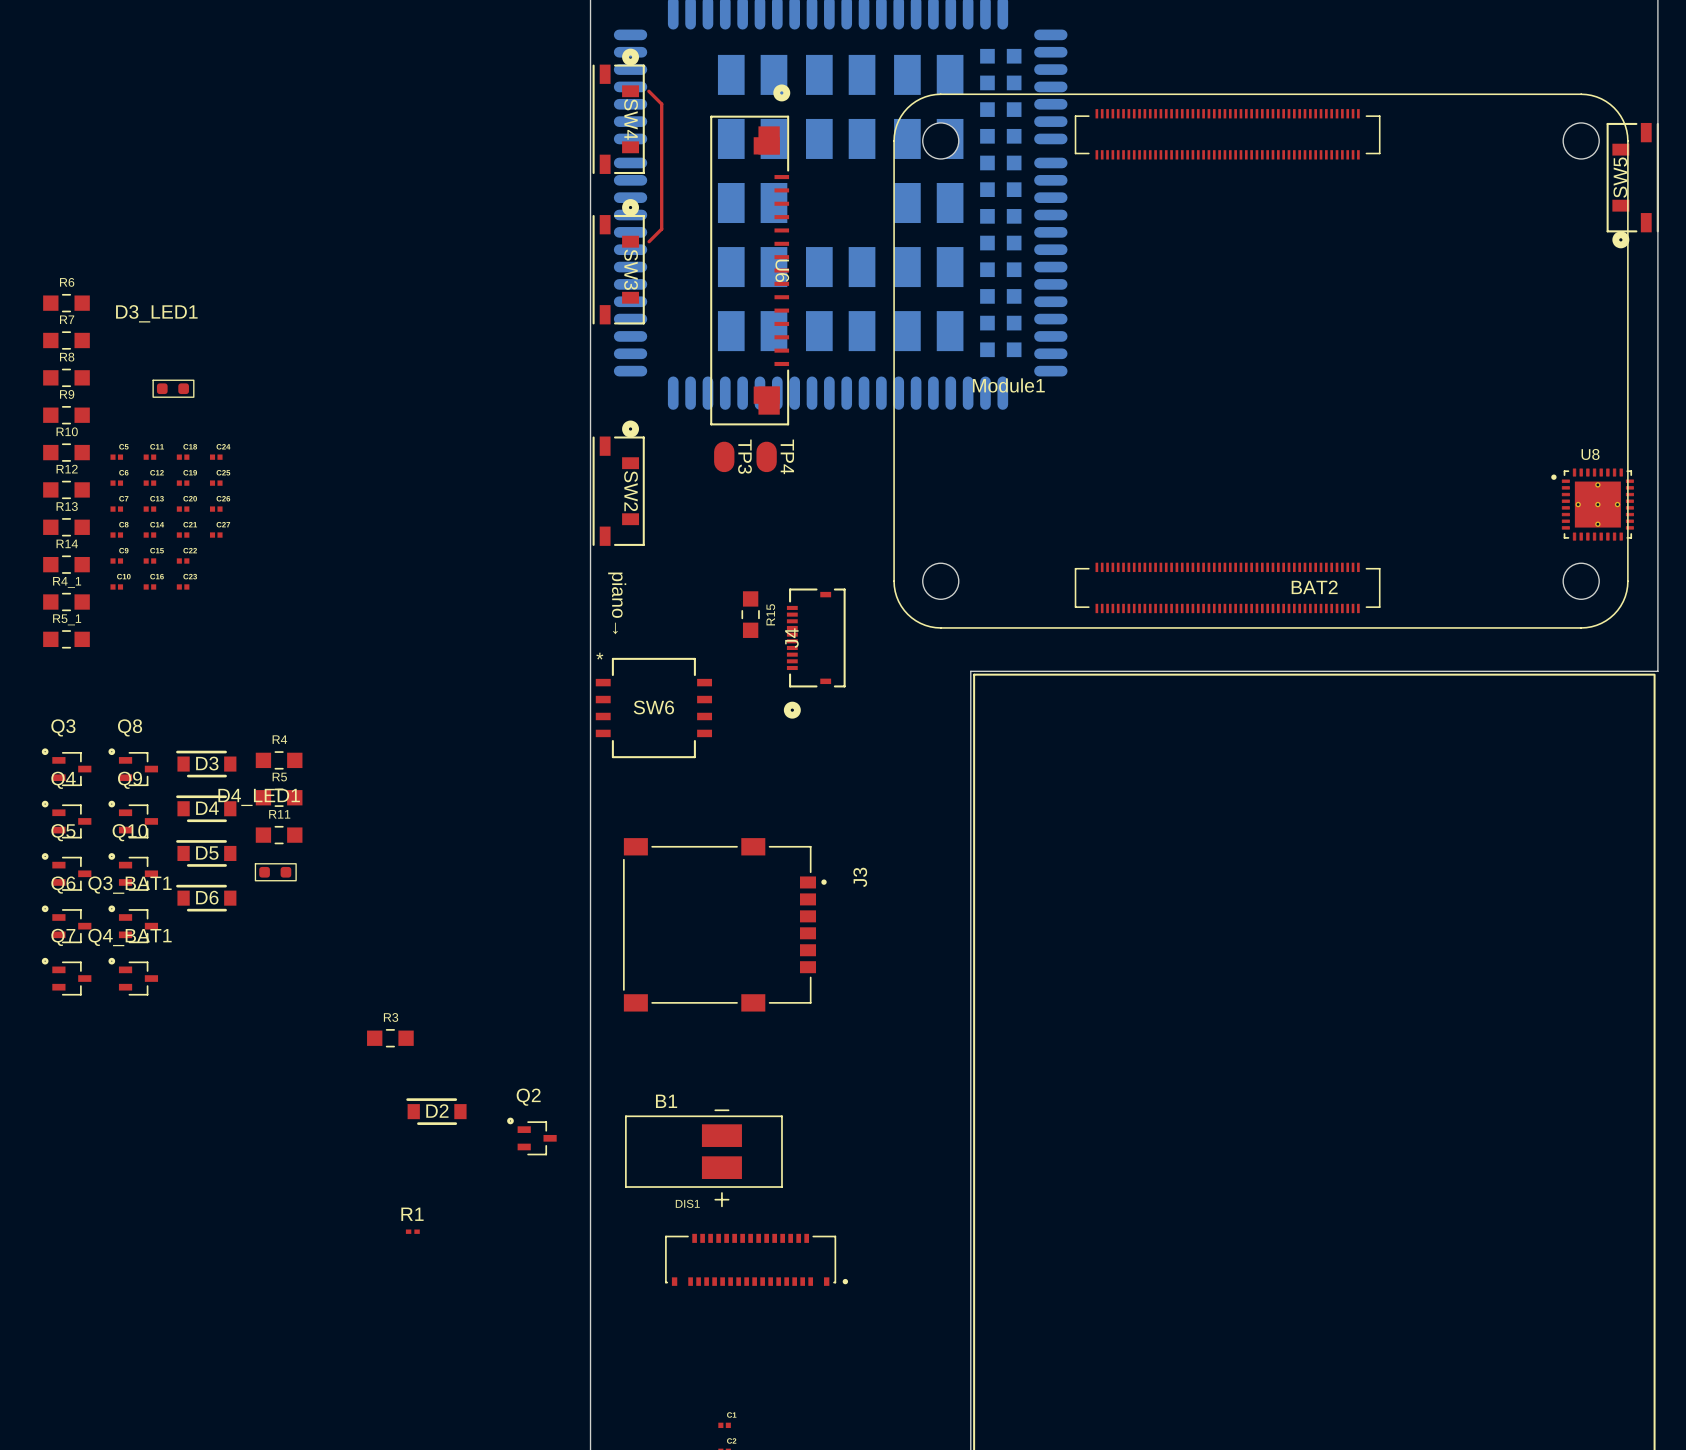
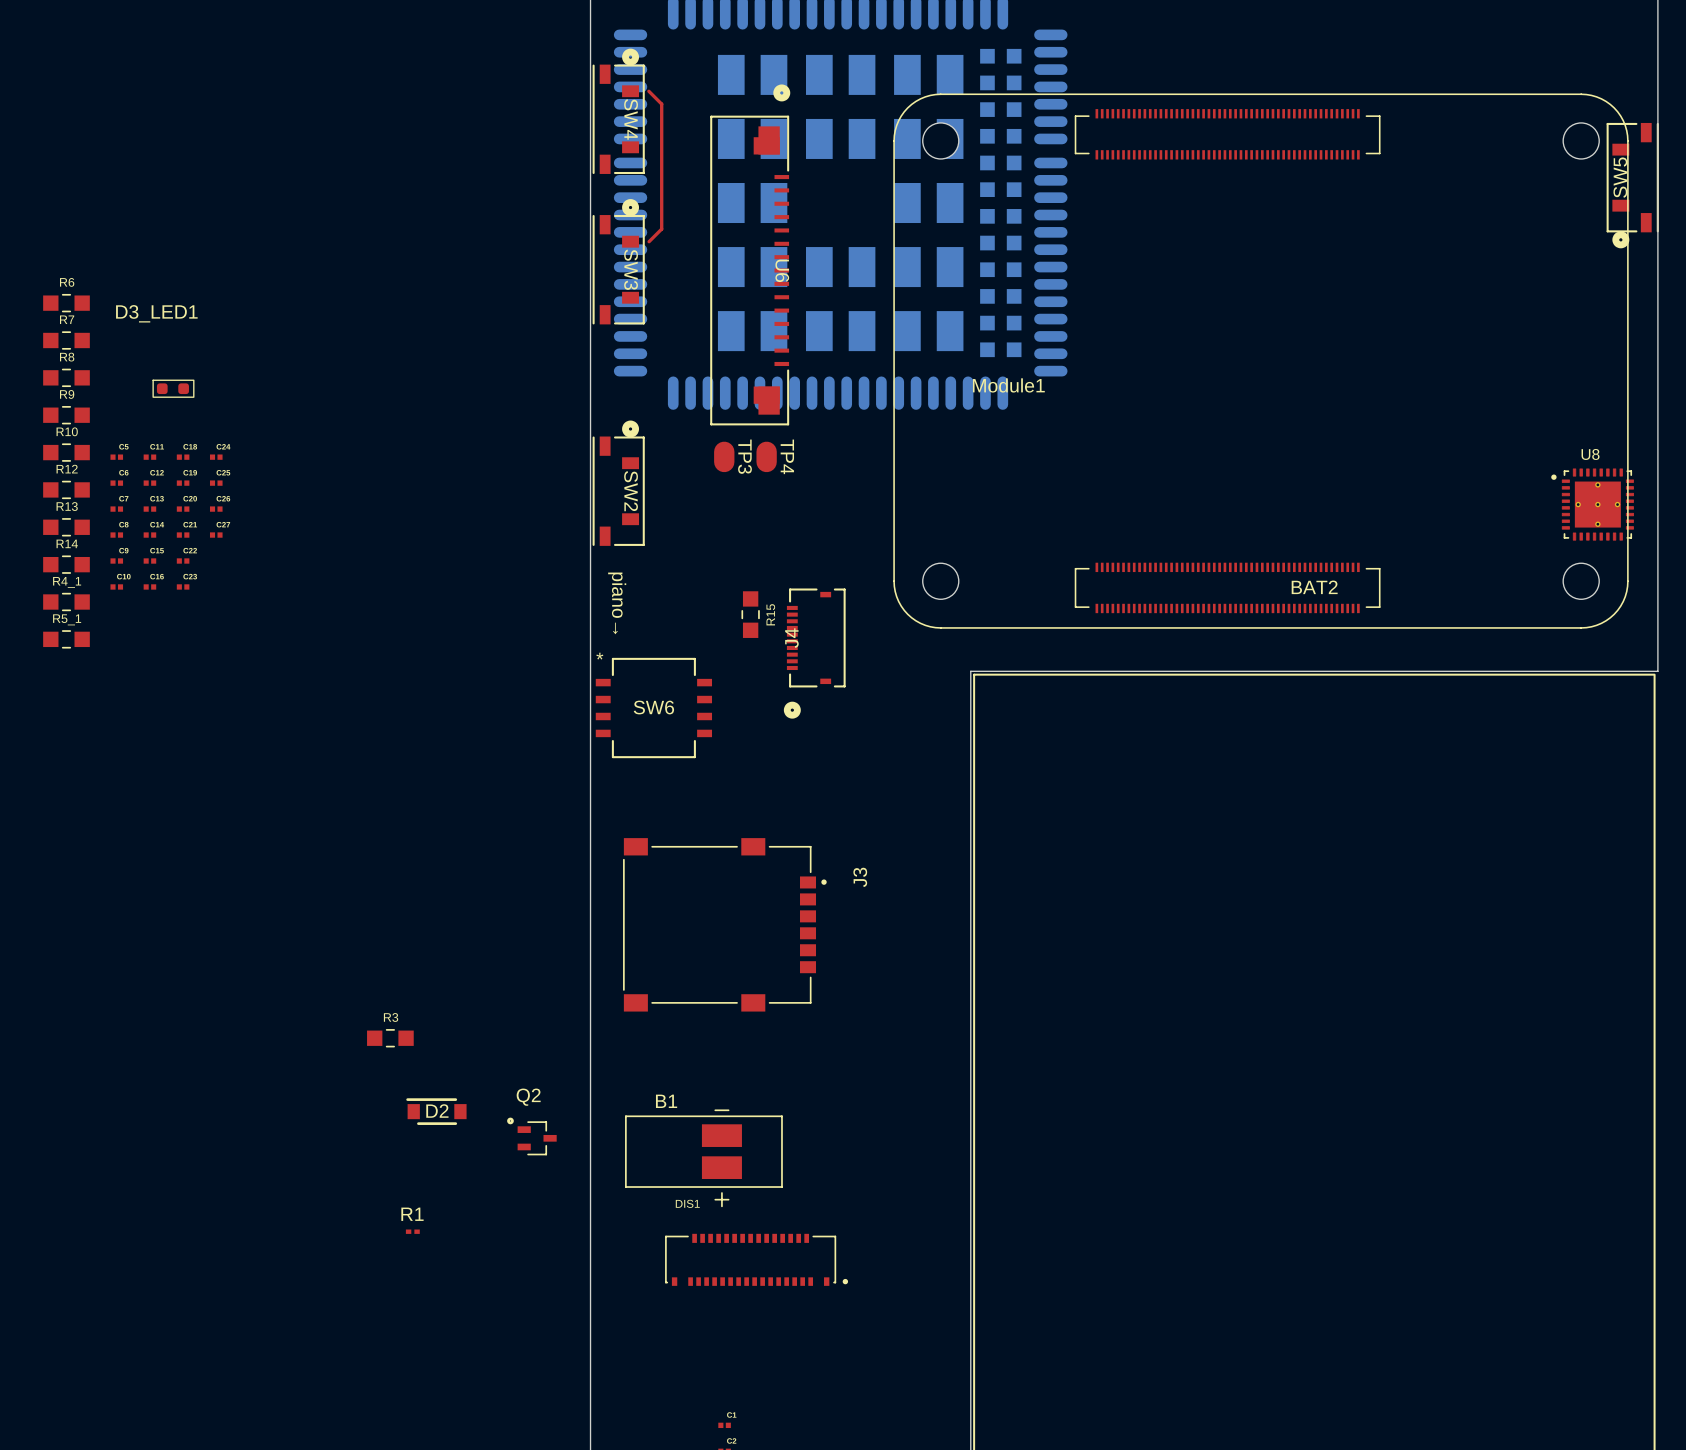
R4: (279, 760) -> none
D3: (206, 764) -> none
Q3: (66, 767) -> none
Q8: (133, 767) -> none
R5: (279, 797) -> none
D4: (206, 808) -> none
Q4: (66, 819) -> none
Q9: (133, 819) -> none
R11: (279, 835) -> none
D5: (206, 853) -> none
Q5: (66, 871) -> none
Q10: (133, 871) -> none
D4_LED1: (275, 872) -> none
D6: (206, 898) -> none
Q6: (66, 924) -> none
Q3_BAT1: (133, 924) -> none
Q7: (66, 976) -> none
Q4_BAT1: (133, 976) -> none

